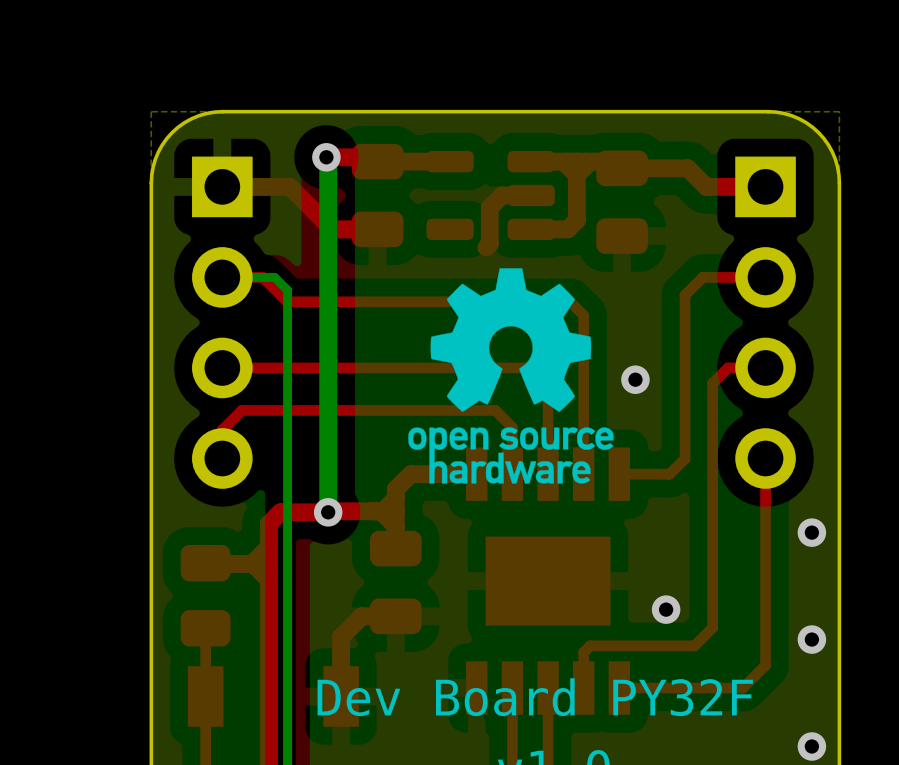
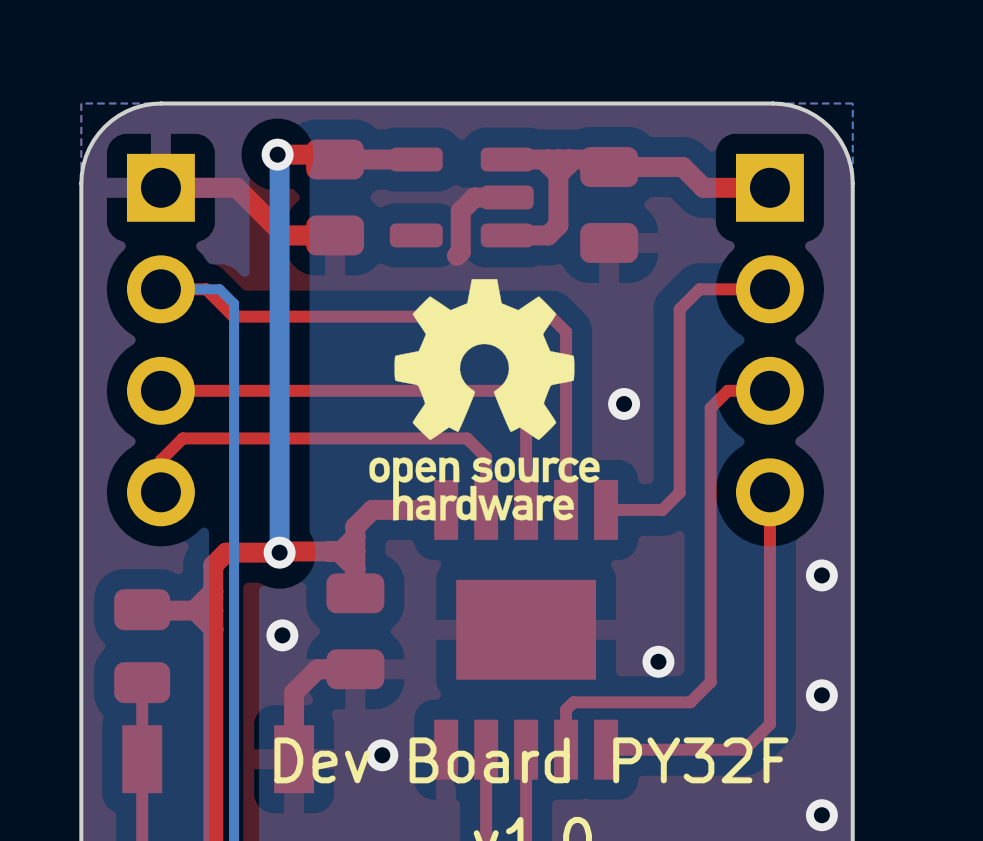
via: none -> (282, 635)
via: none -> (382, 755)

